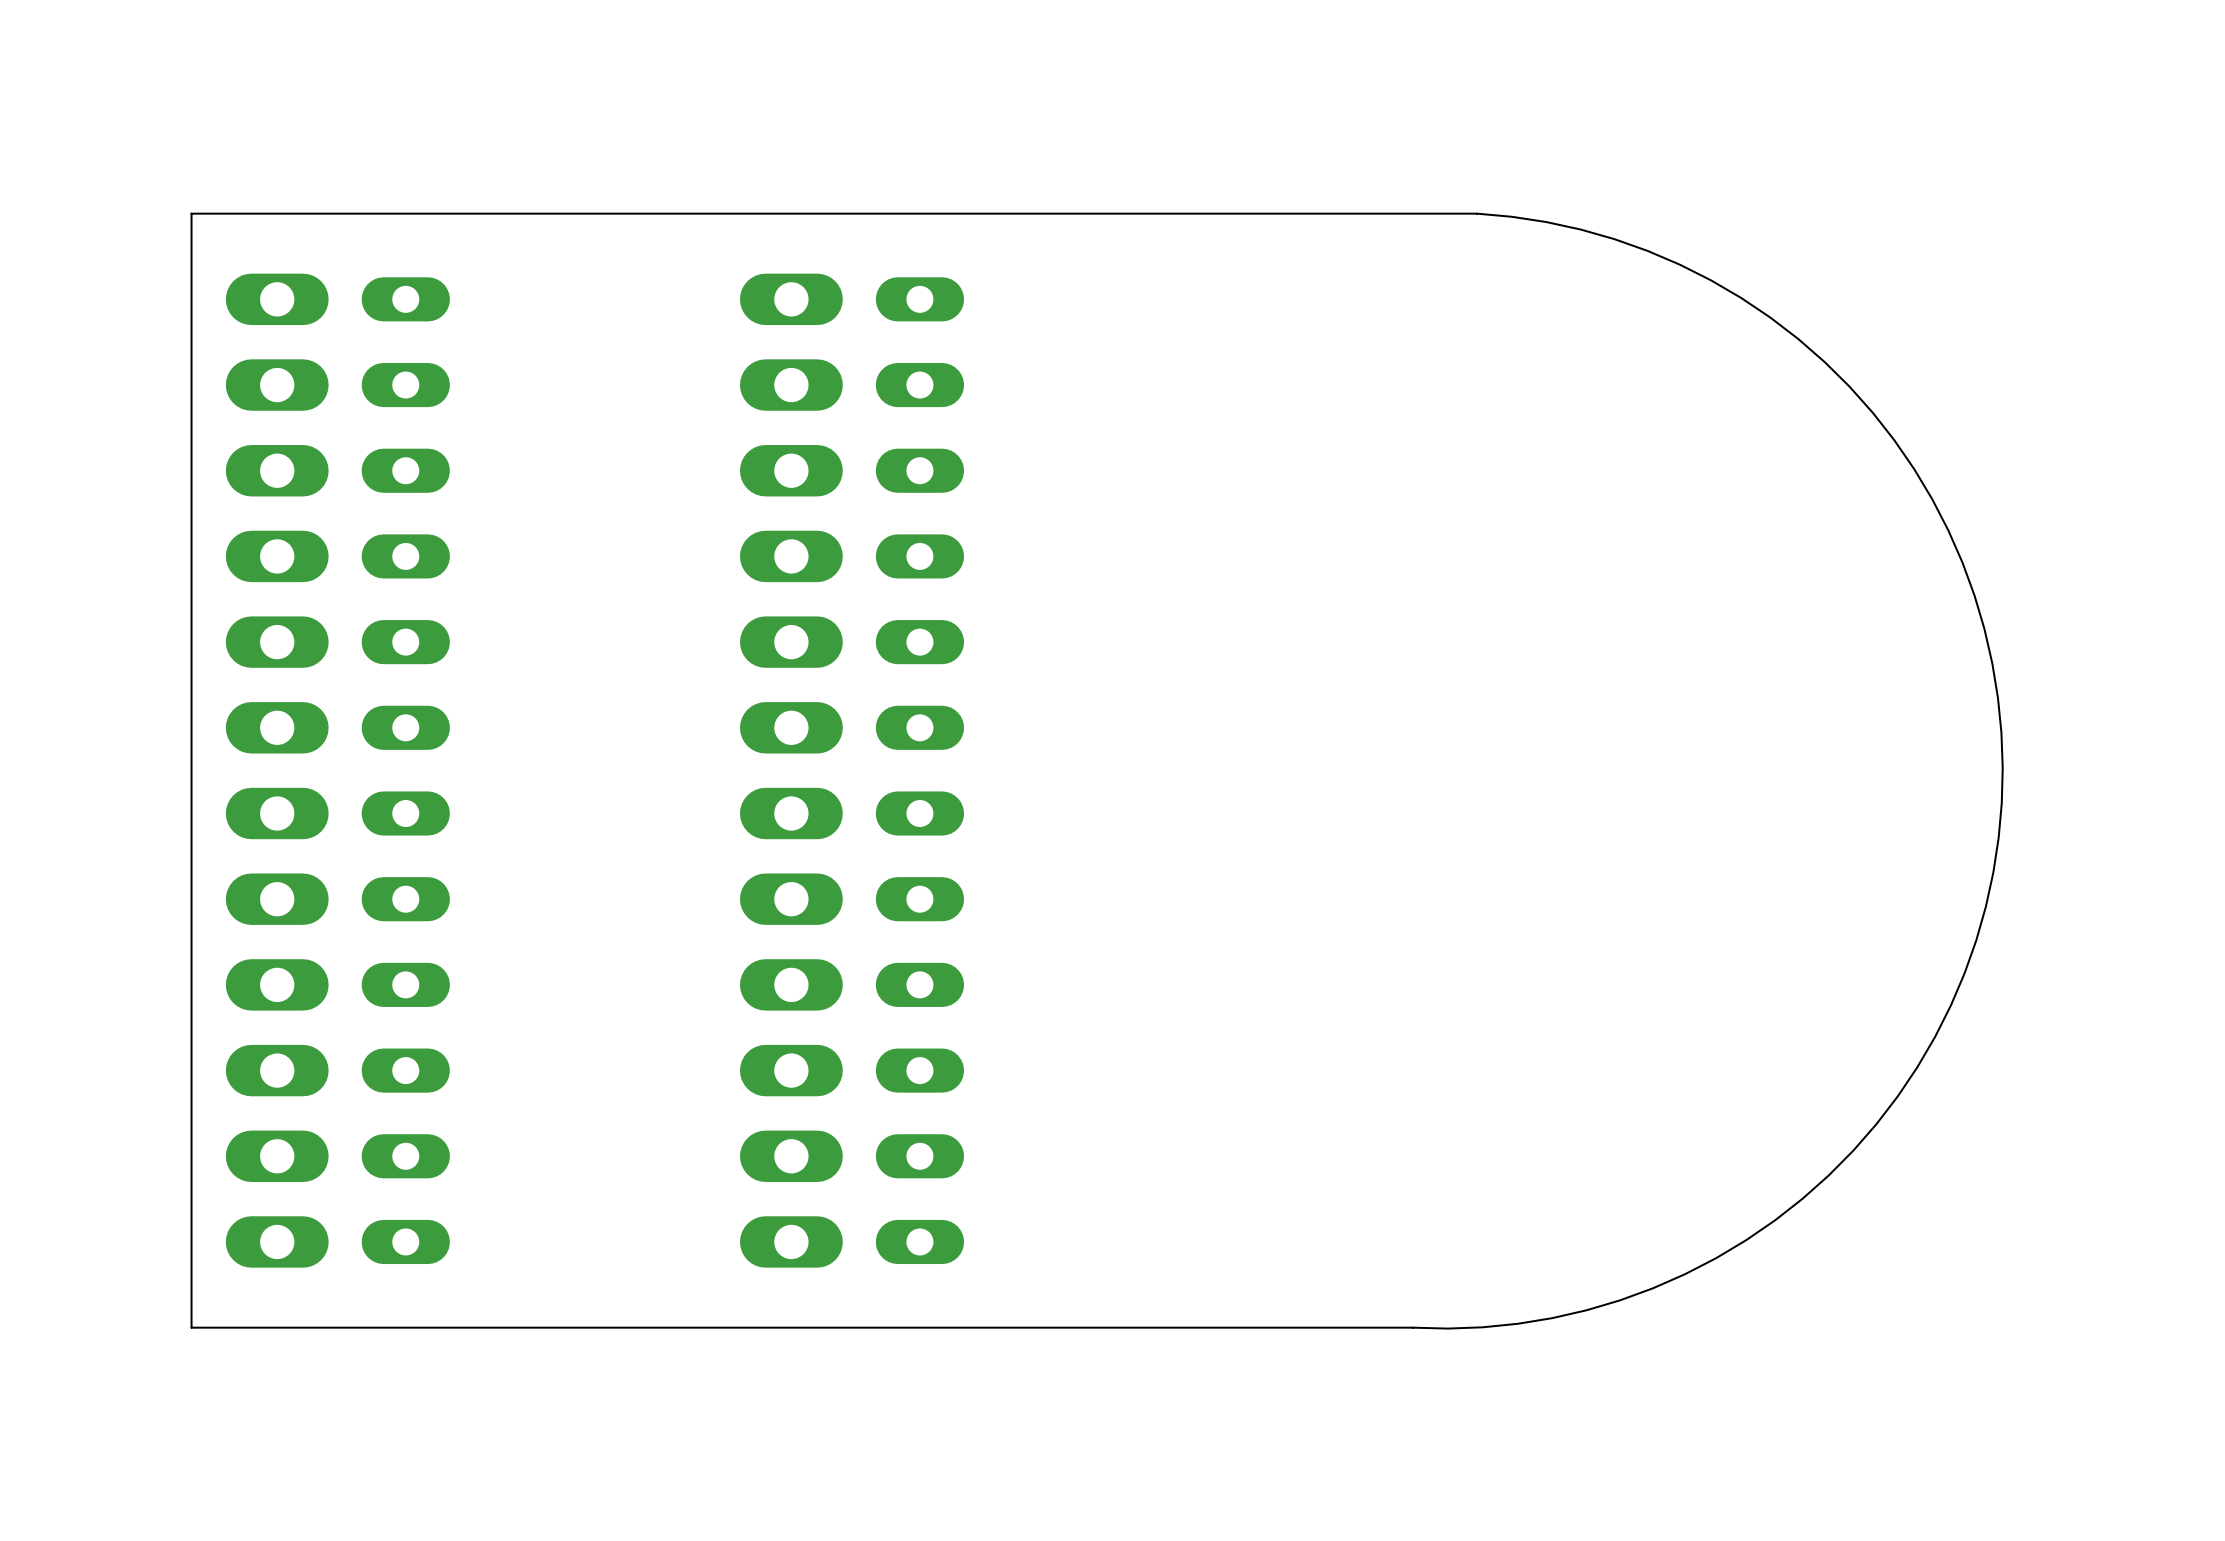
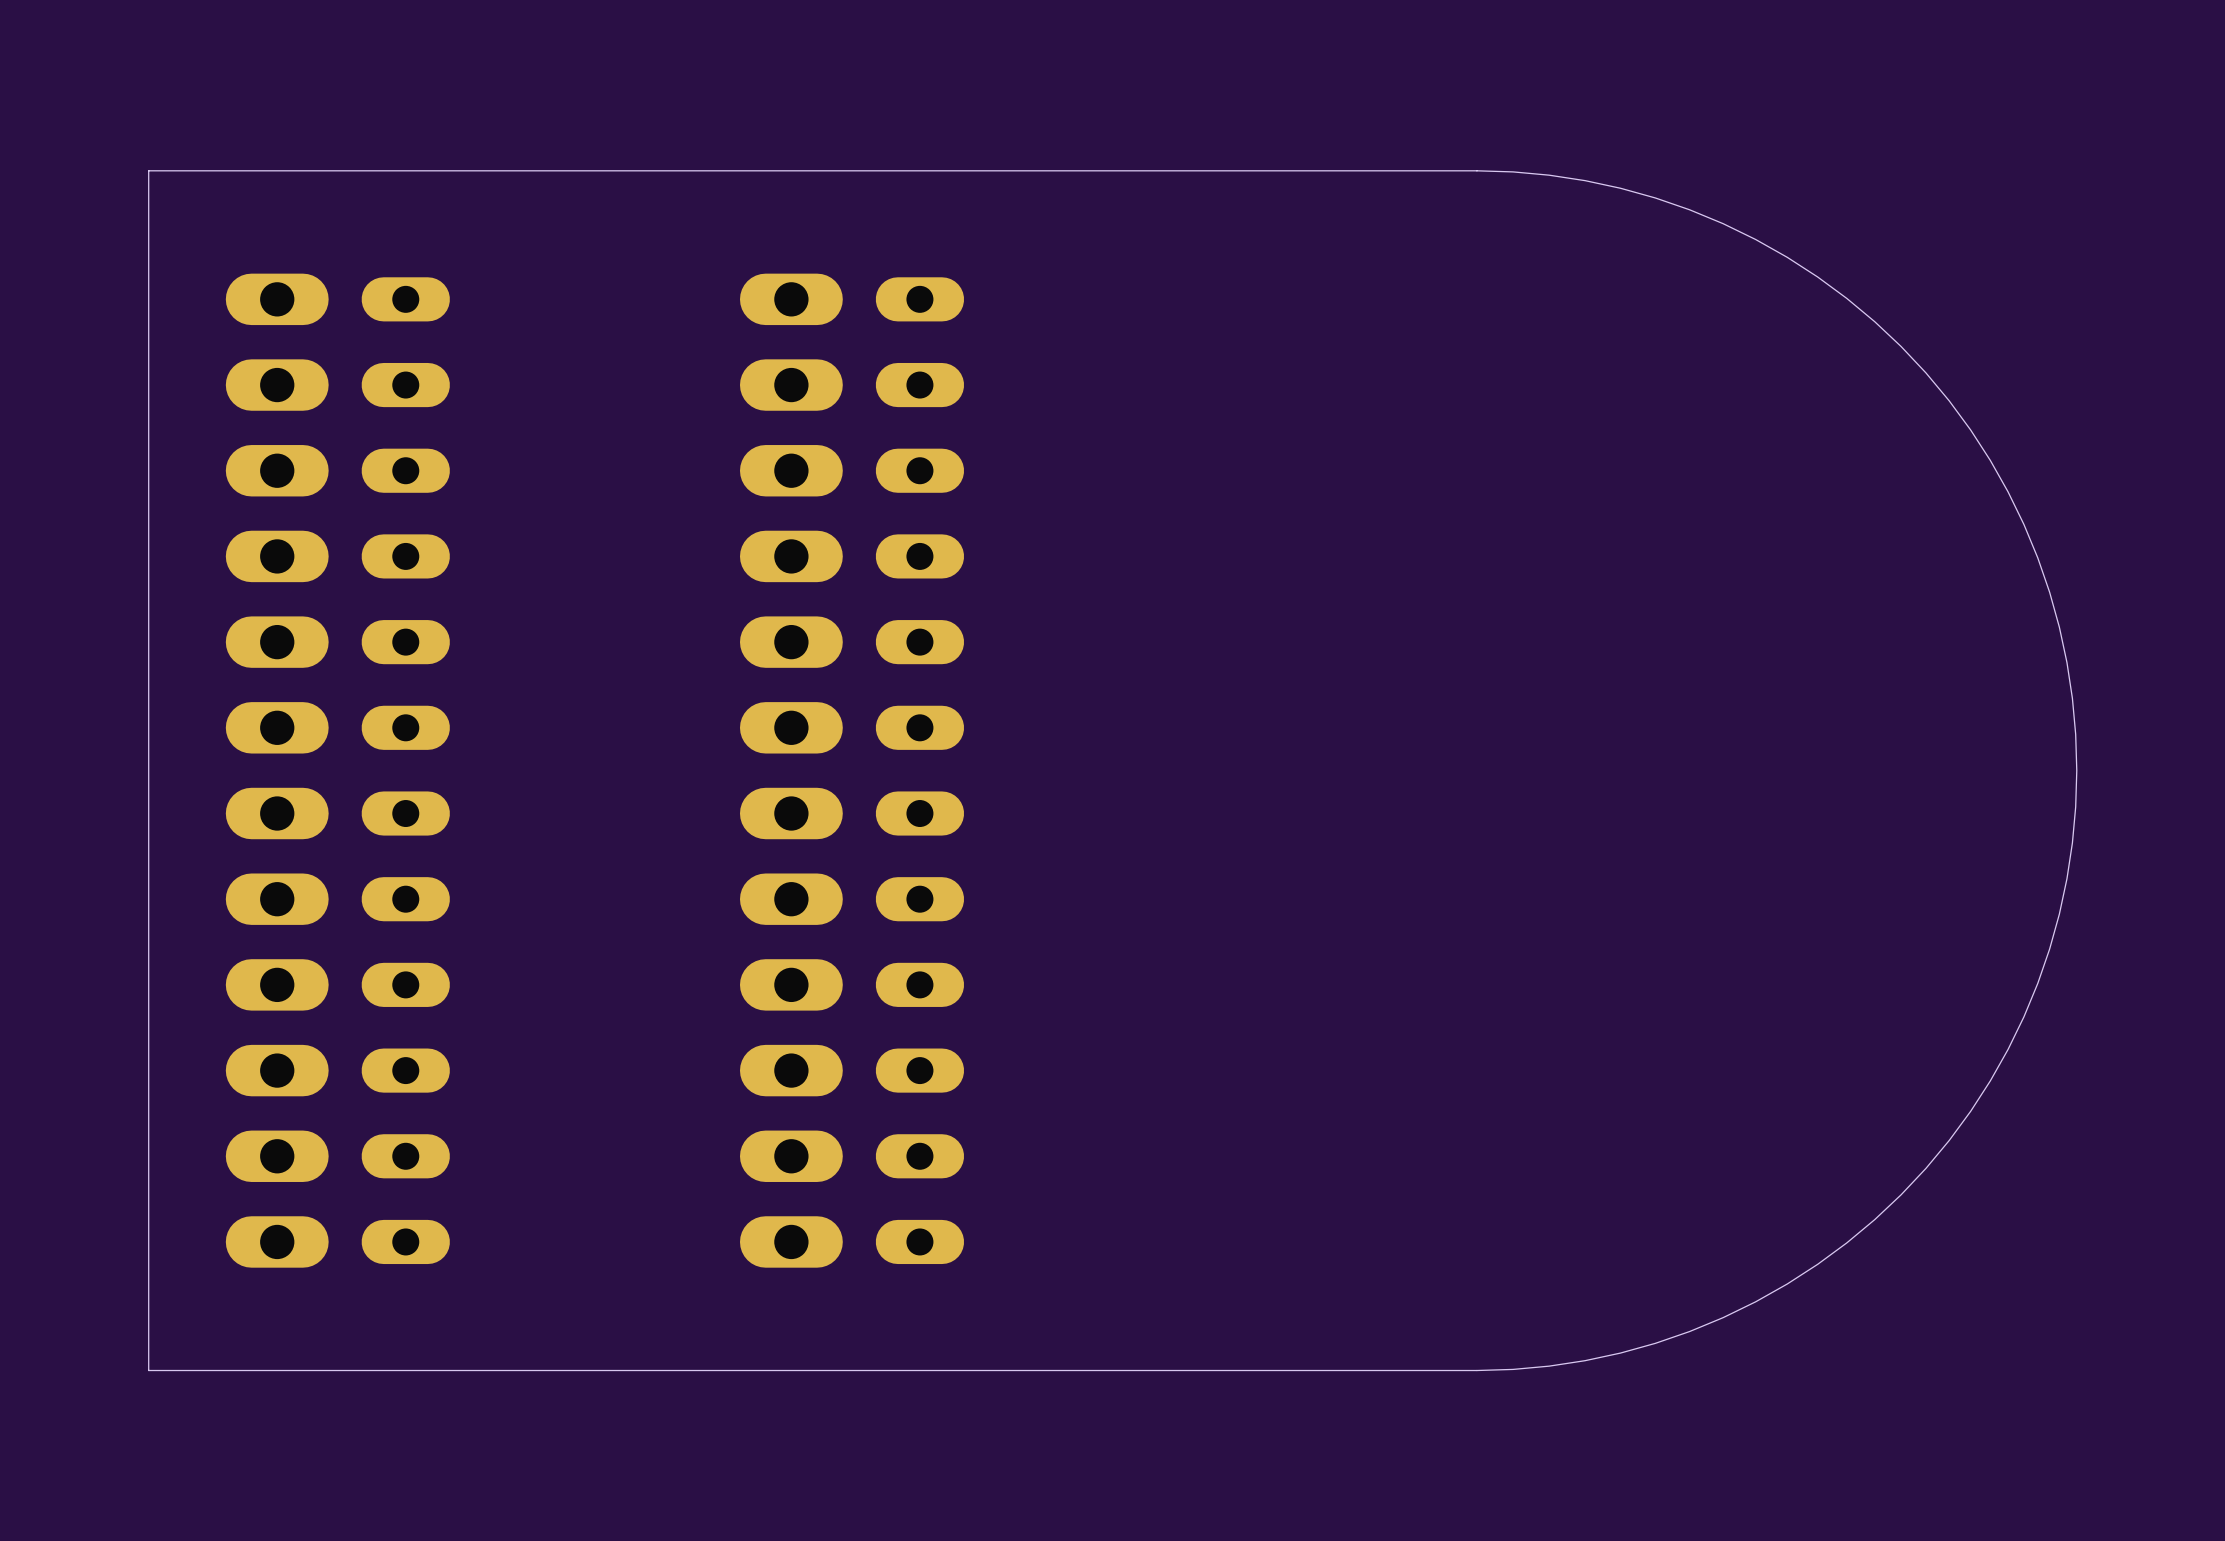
board edge: (1476, 213) (191, 213) (191, 1327) (1482, 1327) (1552, 1318) (1586, 1310) (1652, 1288) (1716, 1258) (1775, 1220) (1802, 1198) (1853, 1150) (1897, 1096) (1917, 1067) (1950, 1005) (1964, 973) (1985, 906) (1998, 837) (2001, 802) (2001, 732) (1992, 663) (1974, 595) (1948, 530) (1932, 499) (1894, 440) (1872, 412) (1824, 361) (1770, 317) (1711, 280) (1647, 250) (1580, 229) (1511, 216) (1476, 213) -> (1476, 170) (1513, 171) (1585, 180) (1655, 197) (1723, 223) (1787, 257) (1817, 276) (1846, 298) (1901, 346) (1949, 400) (1990, 460) (2008, 491) (2037, 557) (2049, 592) (2066, 662) (2075, 734) (2075, 806) (2072, 842) (2059, 914) (2037, 983) (2008, 1049) (1990, 1080) (1949, 1140) (1901, 1194) (1874, 1219) (1817, 1264) (1787, 1284) (1755, 1301) (1689, 1331) (1655, 1343) (1585, 1360) (1513, 1369) (148, 1370) (148, 170) (1476, 170)

